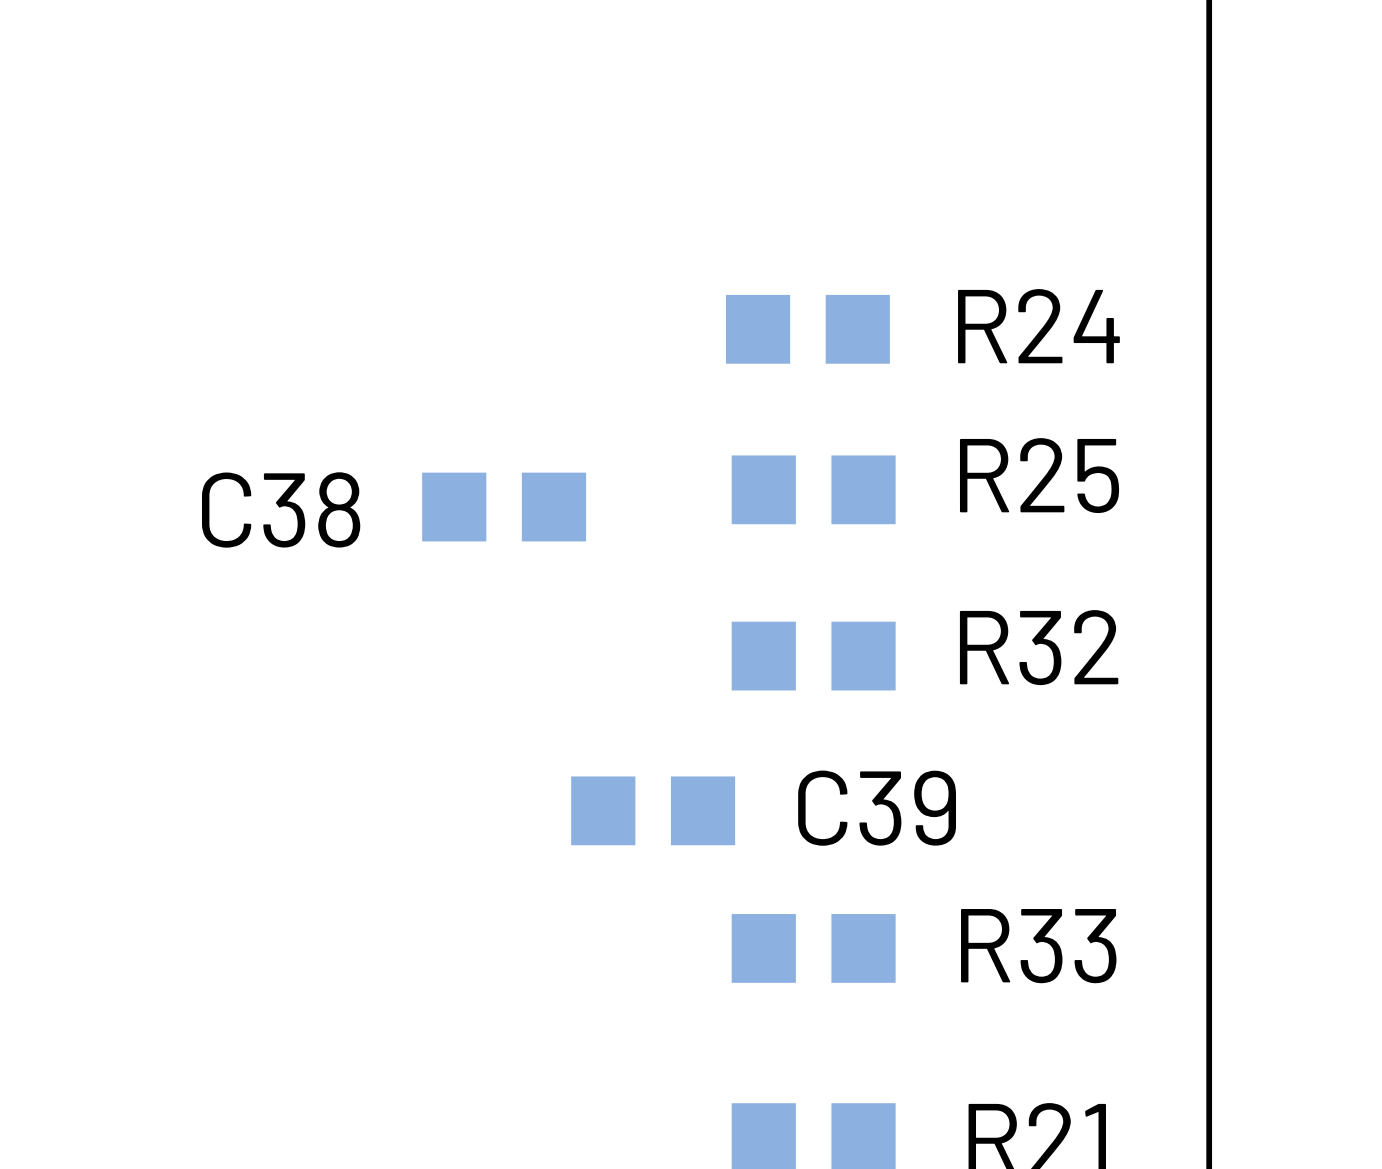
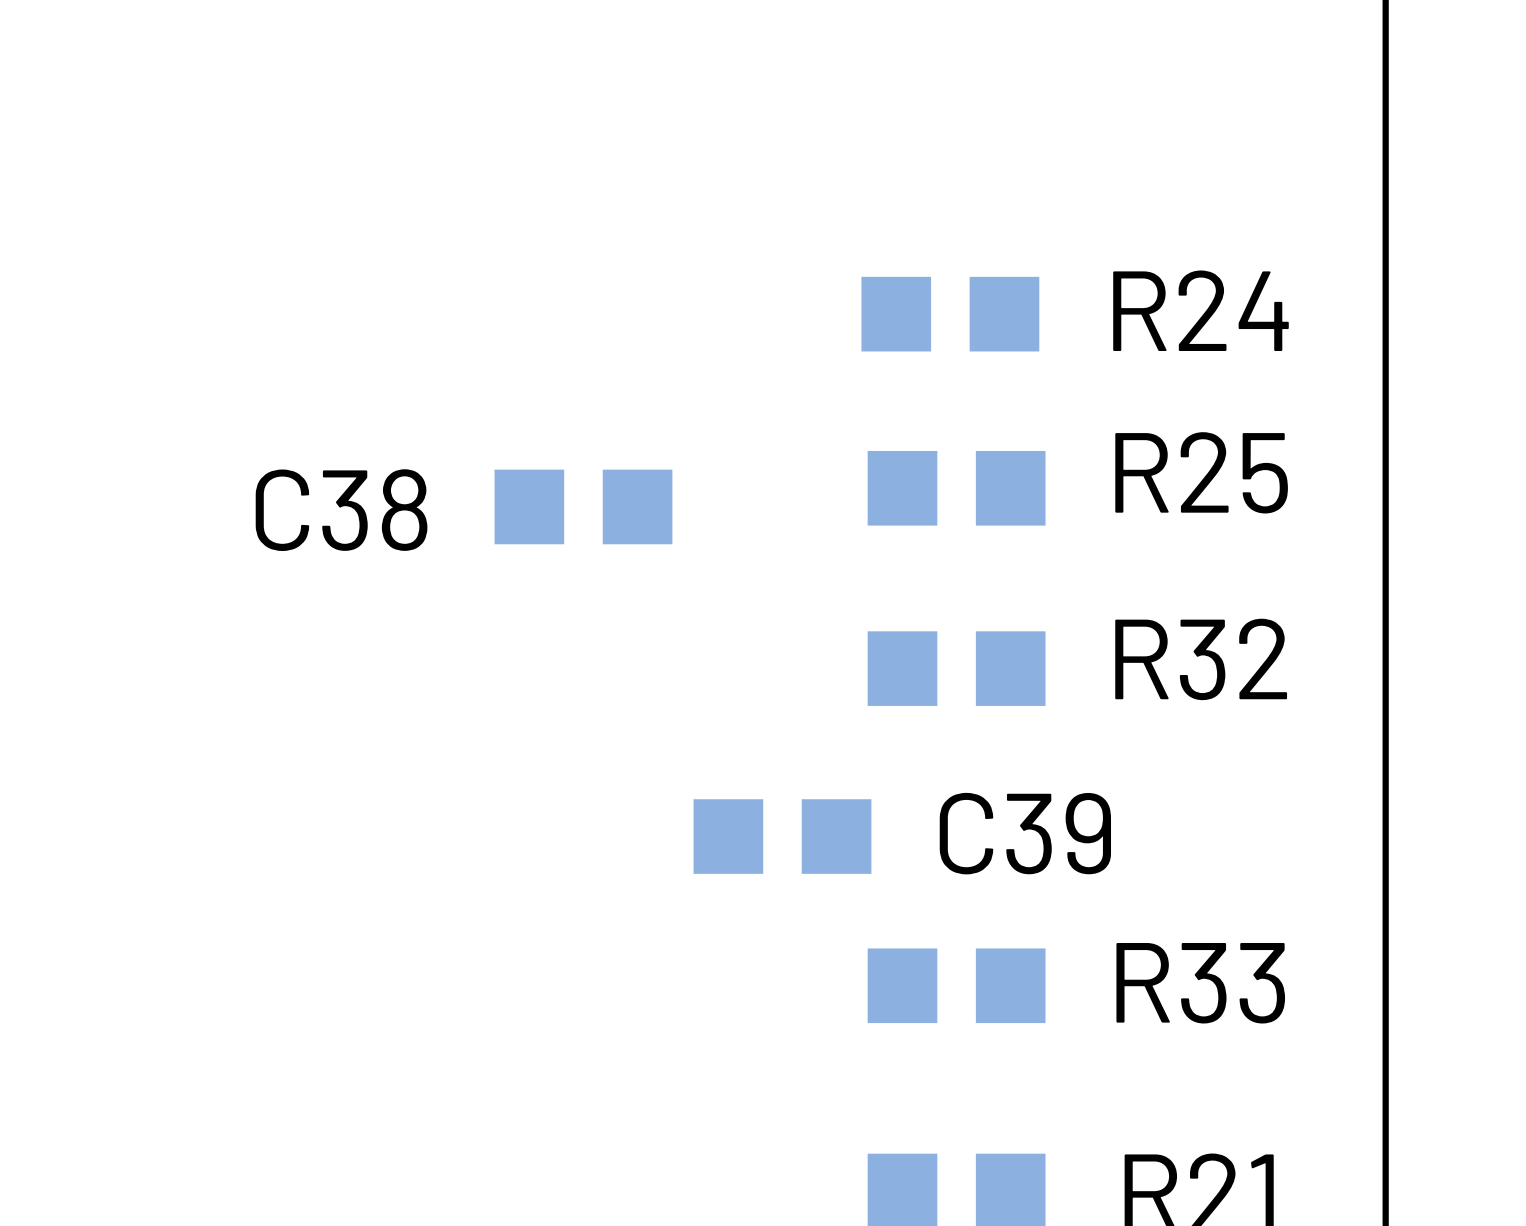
C38 position: (504, 507) -> (583, 506)

